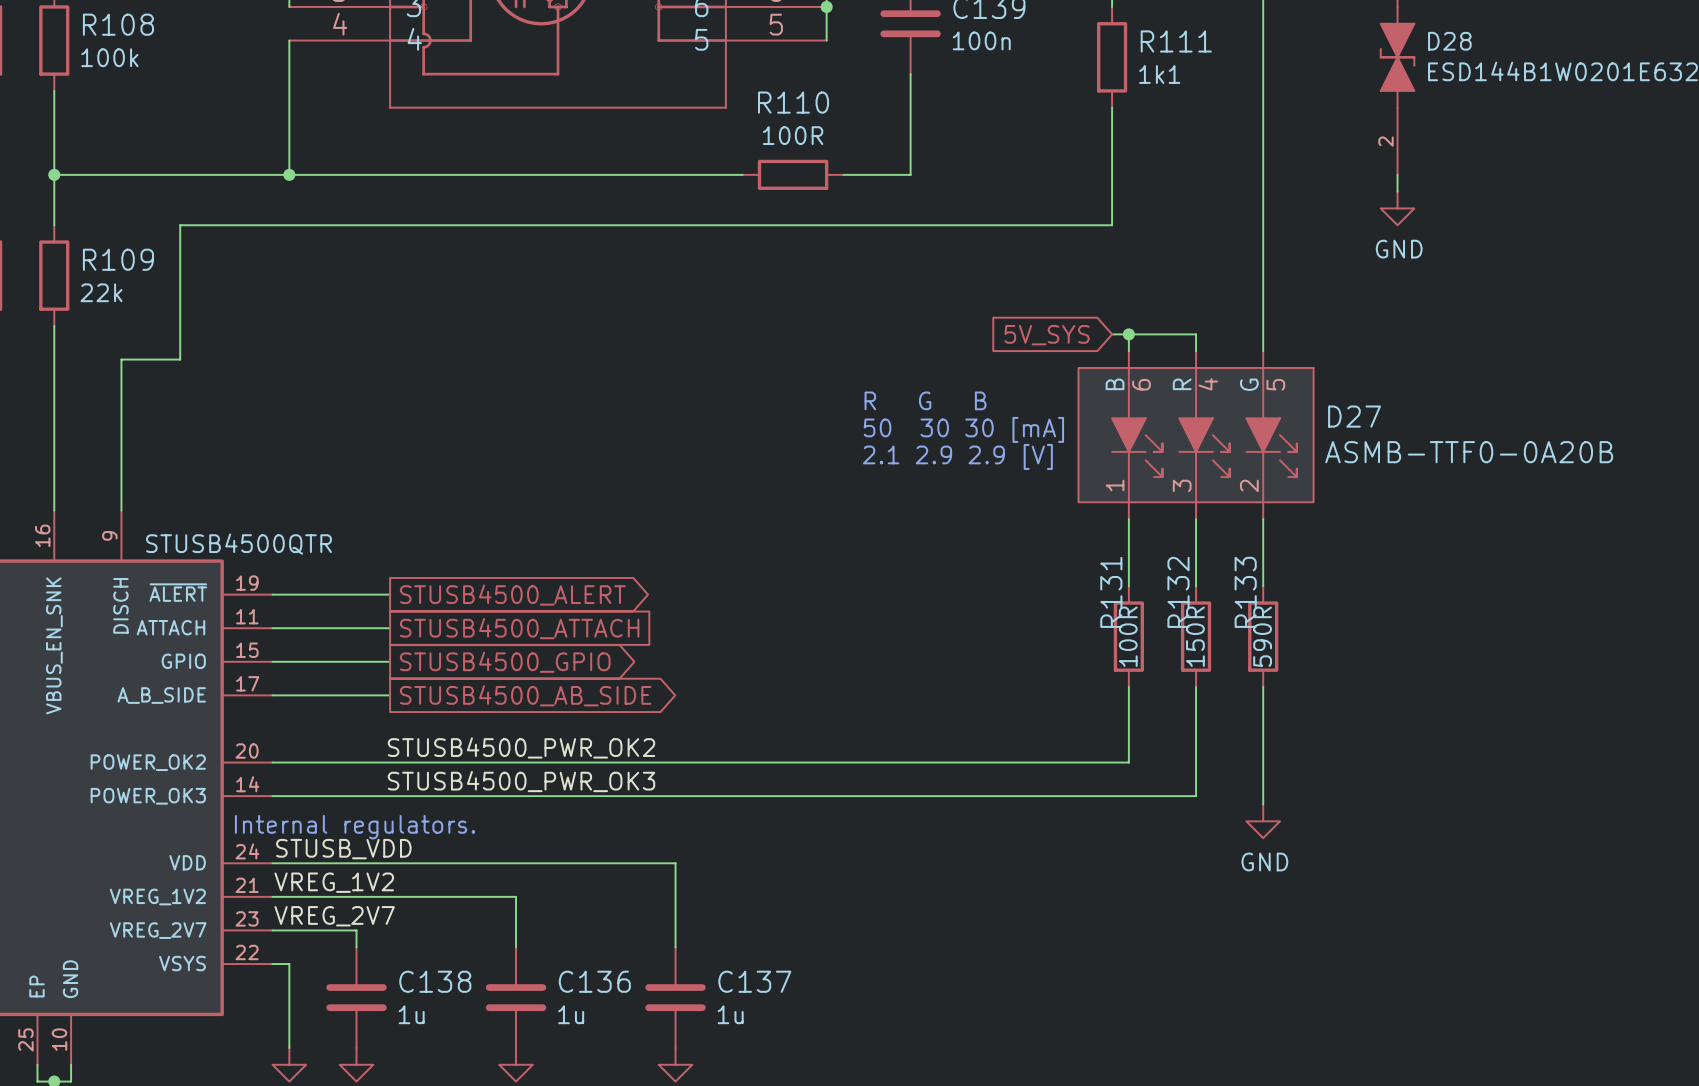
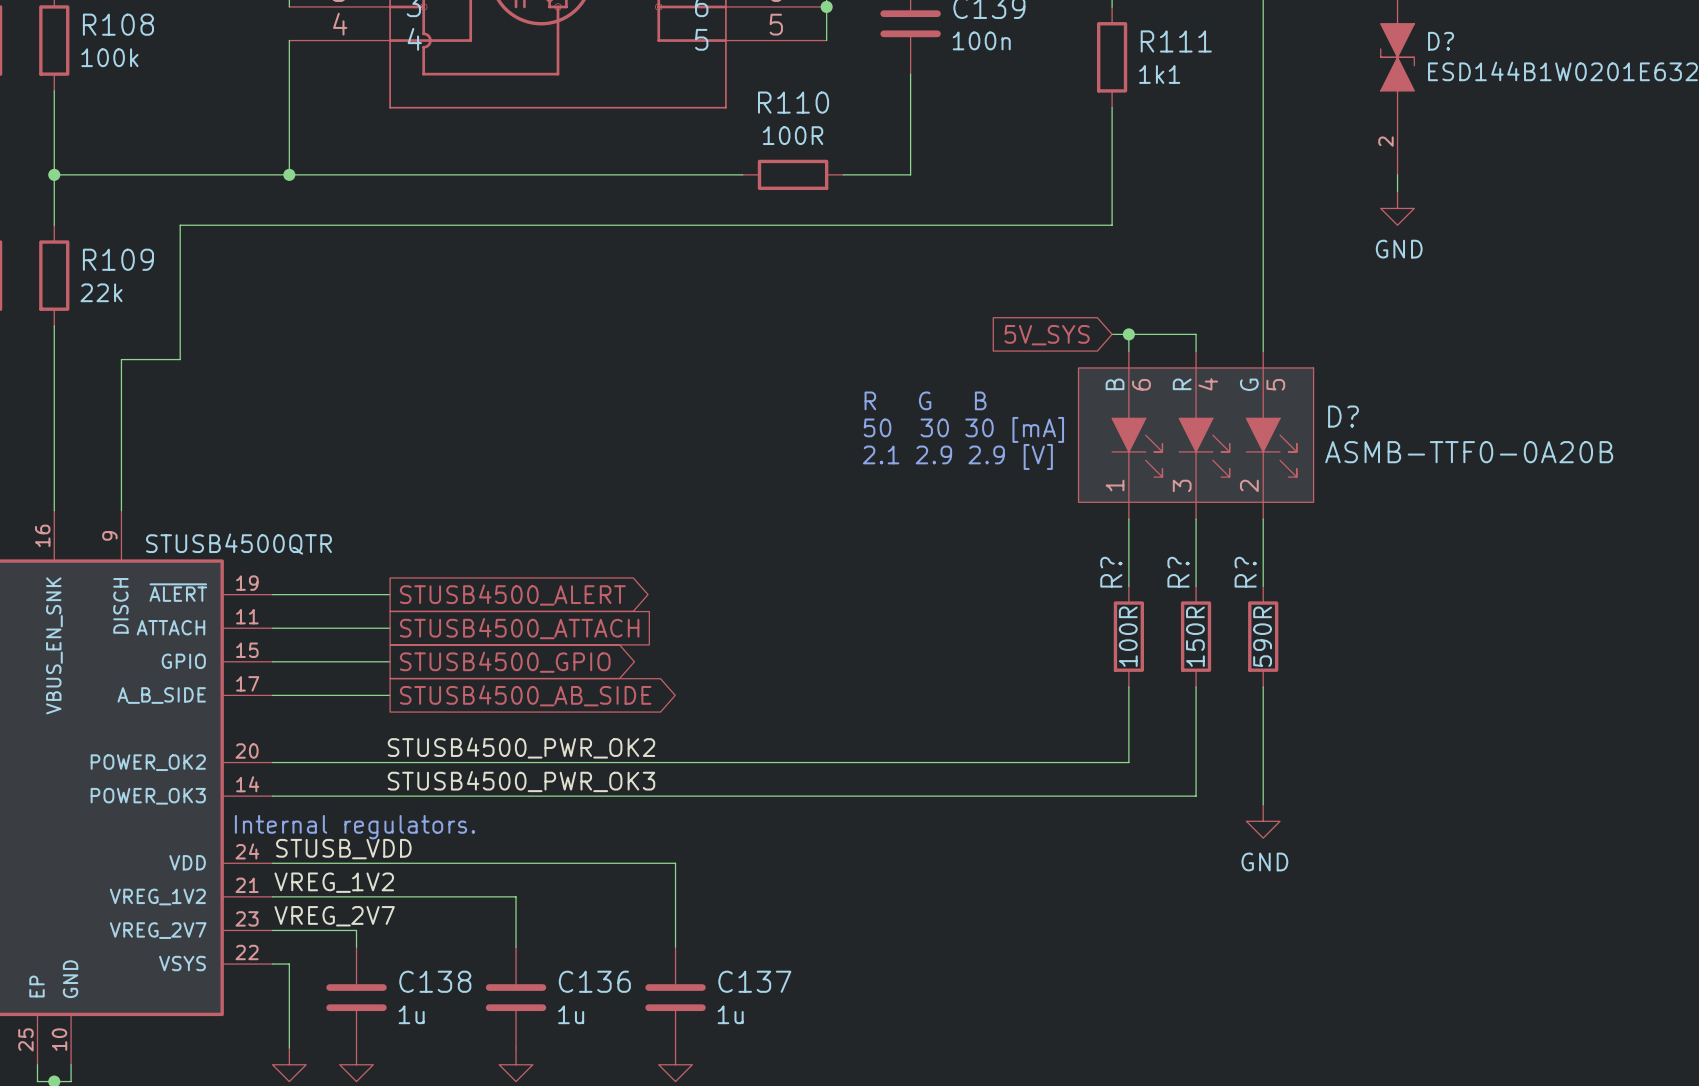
D28 name: D28 (1449, 41) -> D? (1441, 41)
D27 name: D27 (1354, 416) -> D? (1343, 416)
R131 name: R131 (1111, 592) -> R? (1111, 572)
R132 name: R132 (1178, 592) -> R? (1178, 572)
R133 name: R133 (1245, 592) -> R? (1245, 572)

